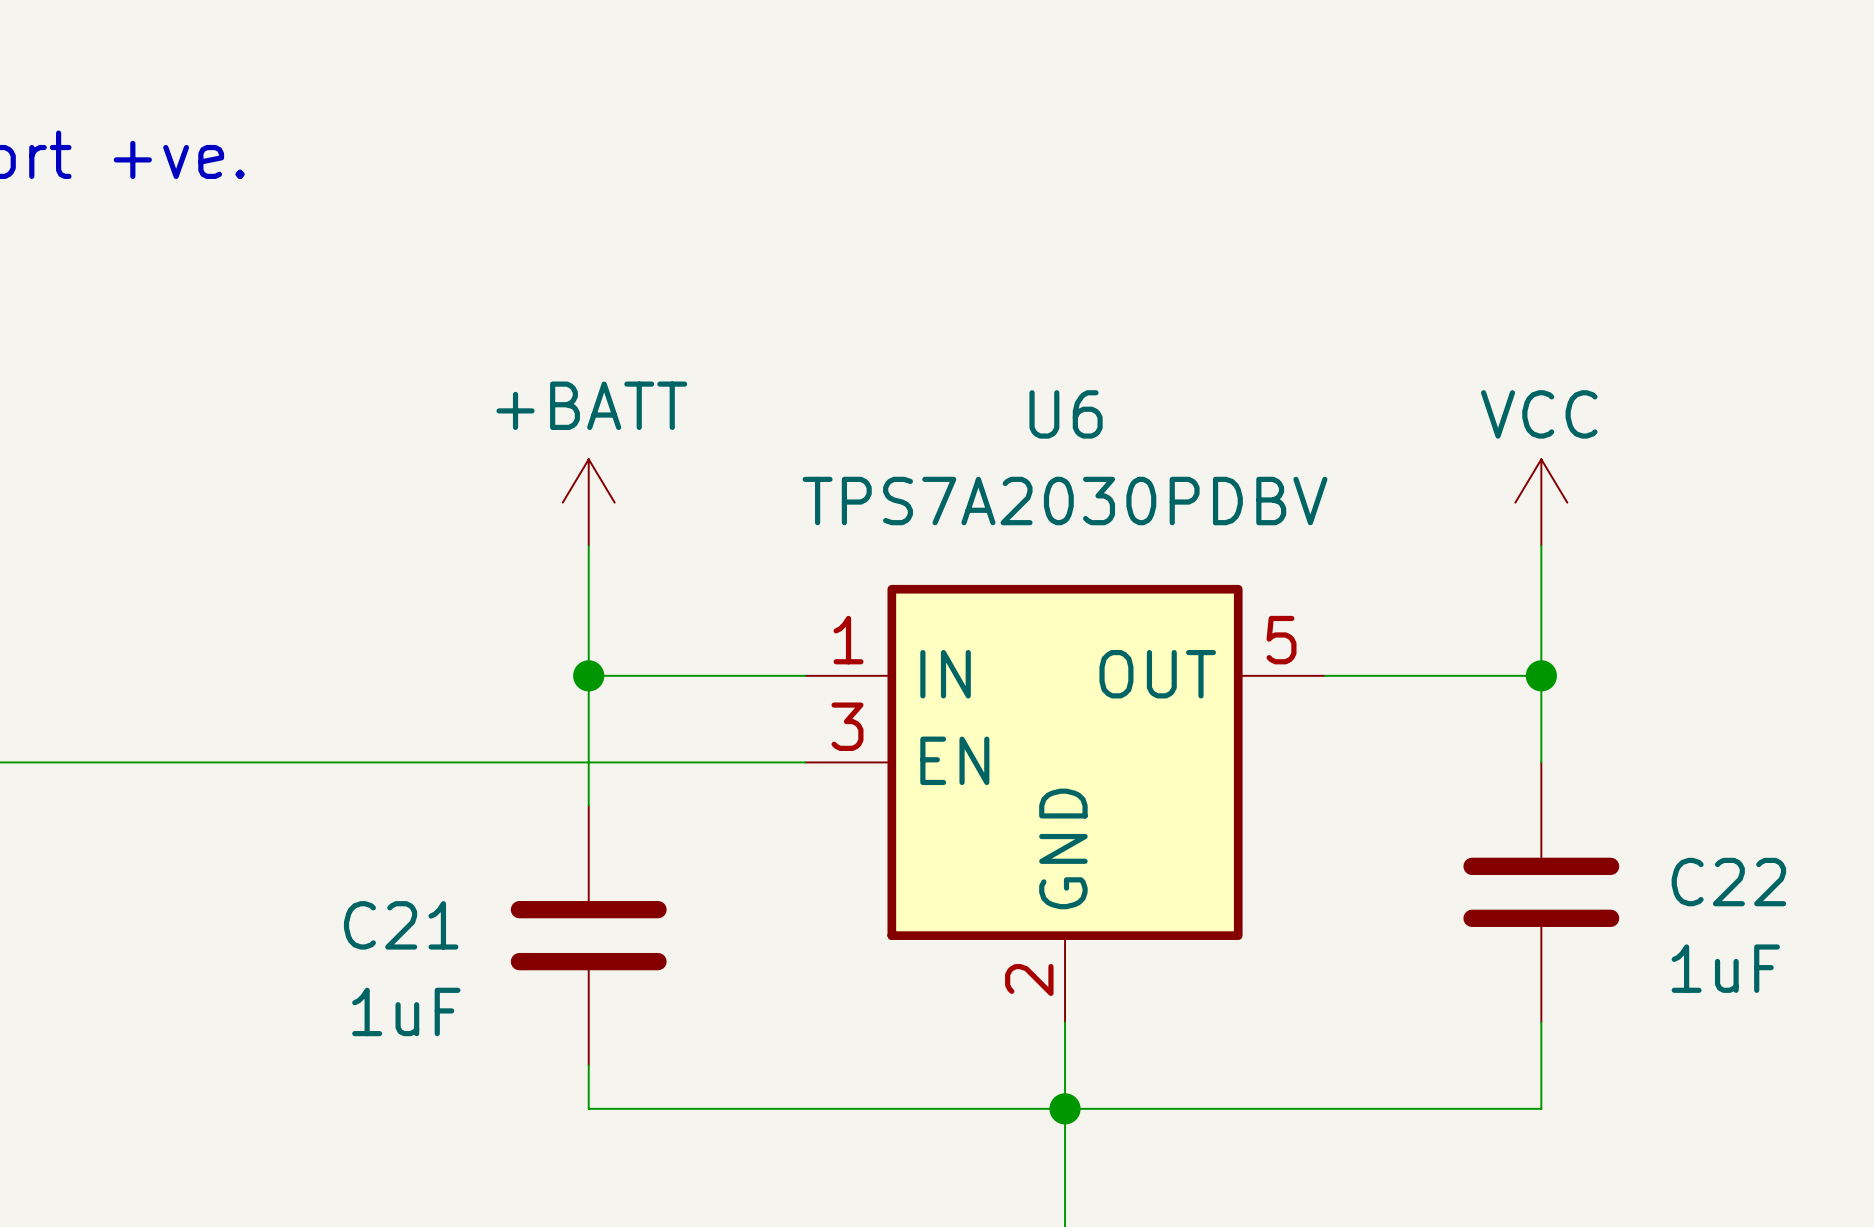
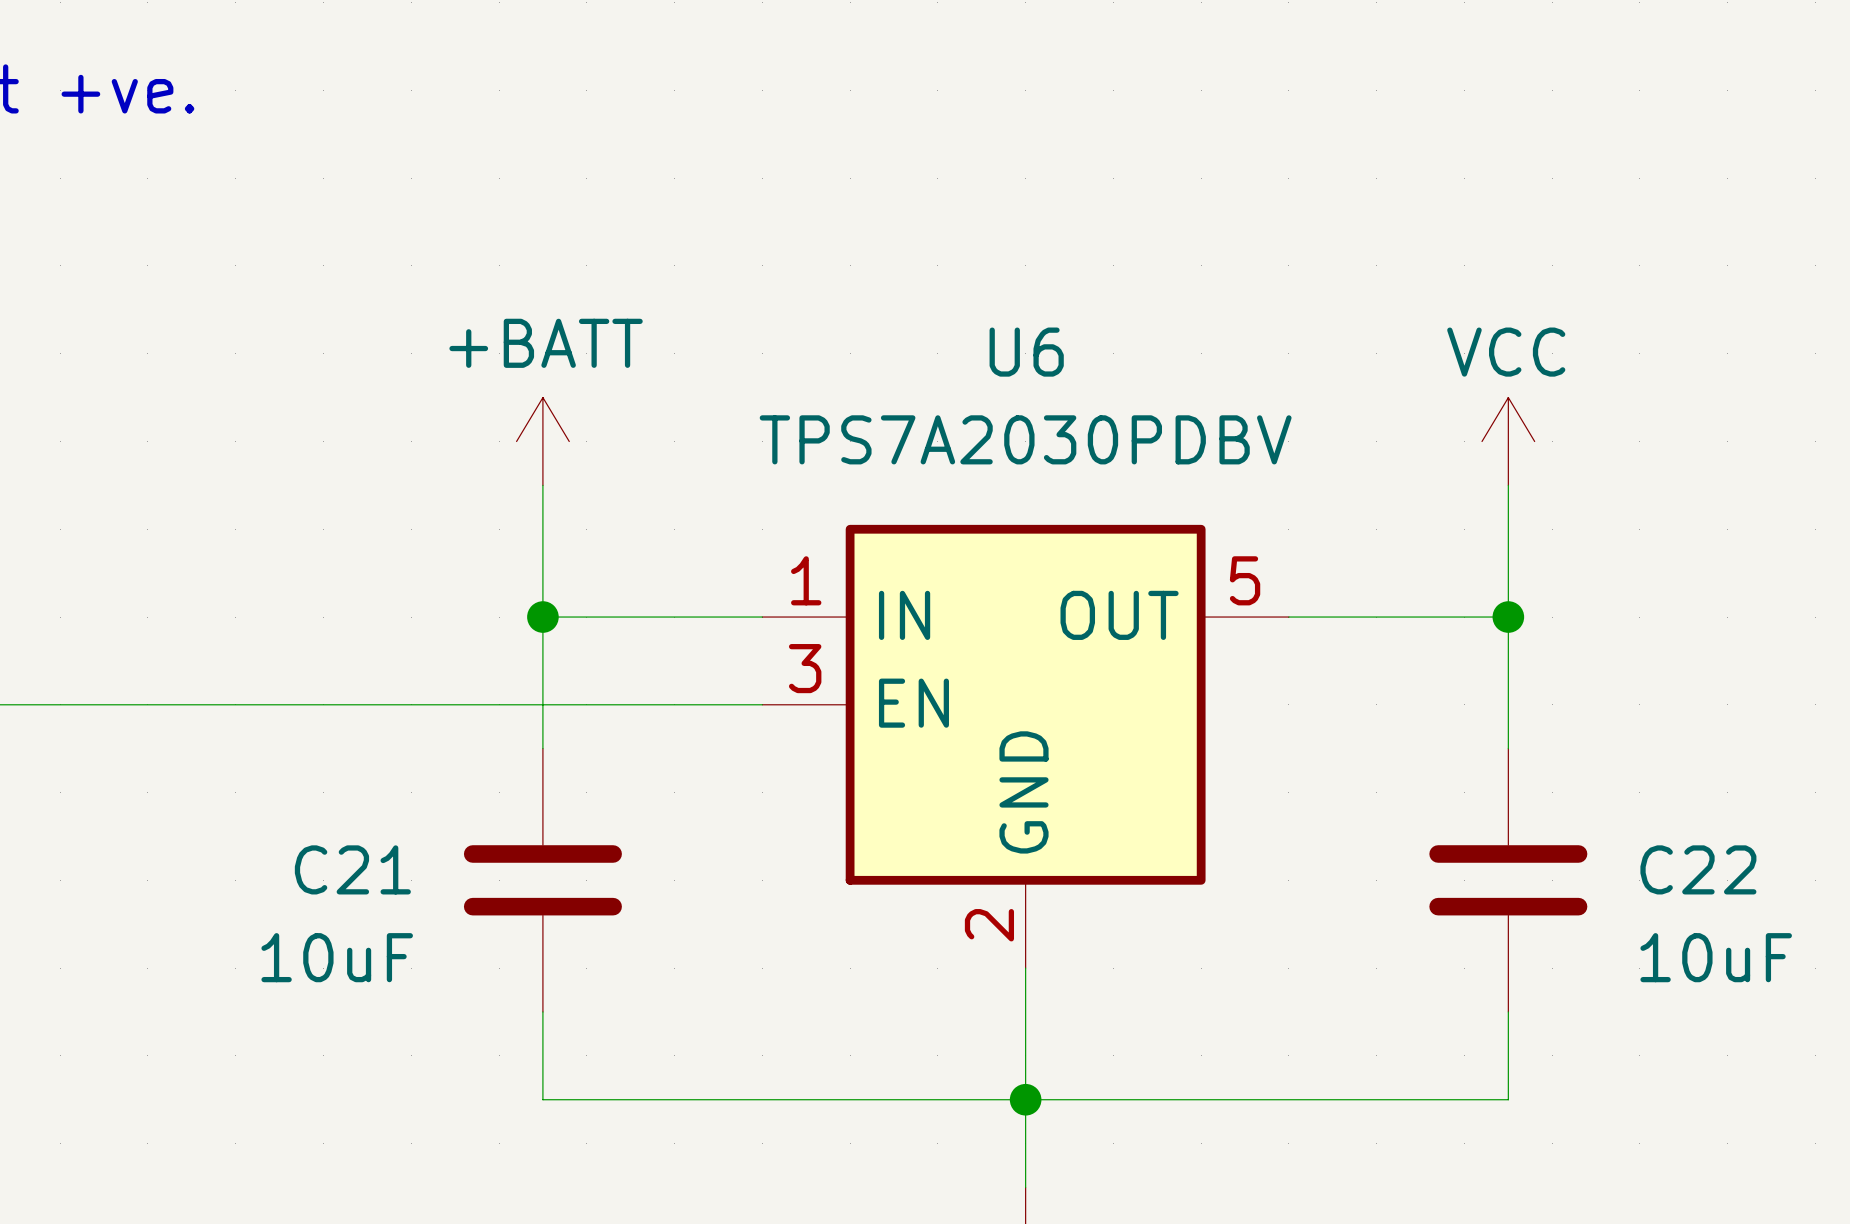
C22 position: (1541, 892) -> (1508, 880)
C22 value: 1uF (1725, 968) -> 10uF (1716, 957)
C21 value: 1uF (406, 1011) -> 10uF (337, 957)
wire: (588, 1108) (1541, 1108) -> (542, 1055) (542, 1099) (1508, 1099) (1508, 1055)
junction position: (1065, 1108) -> (1025, 1099)

